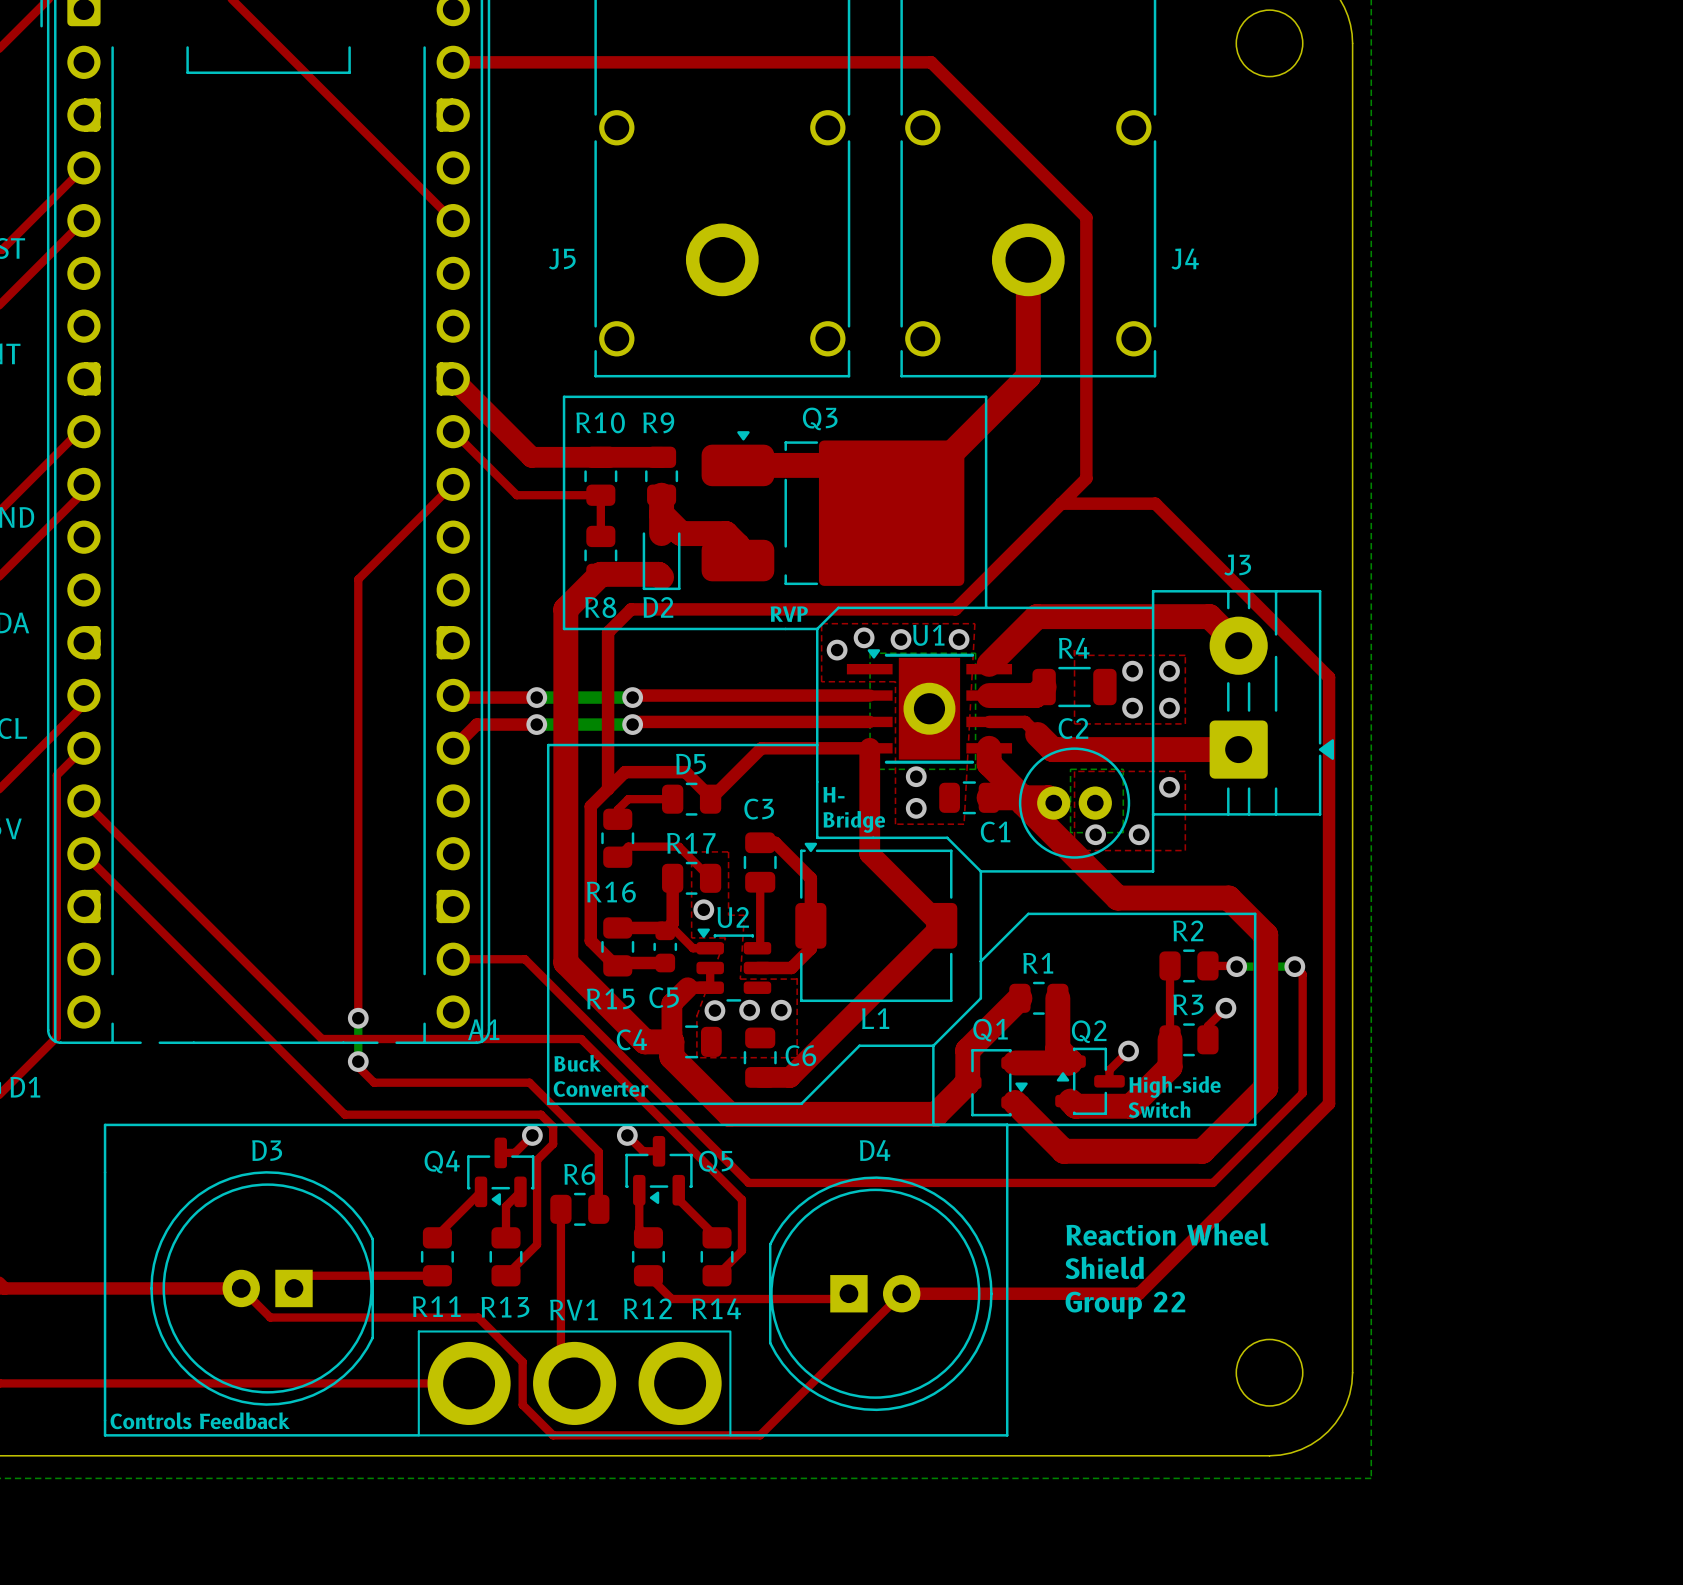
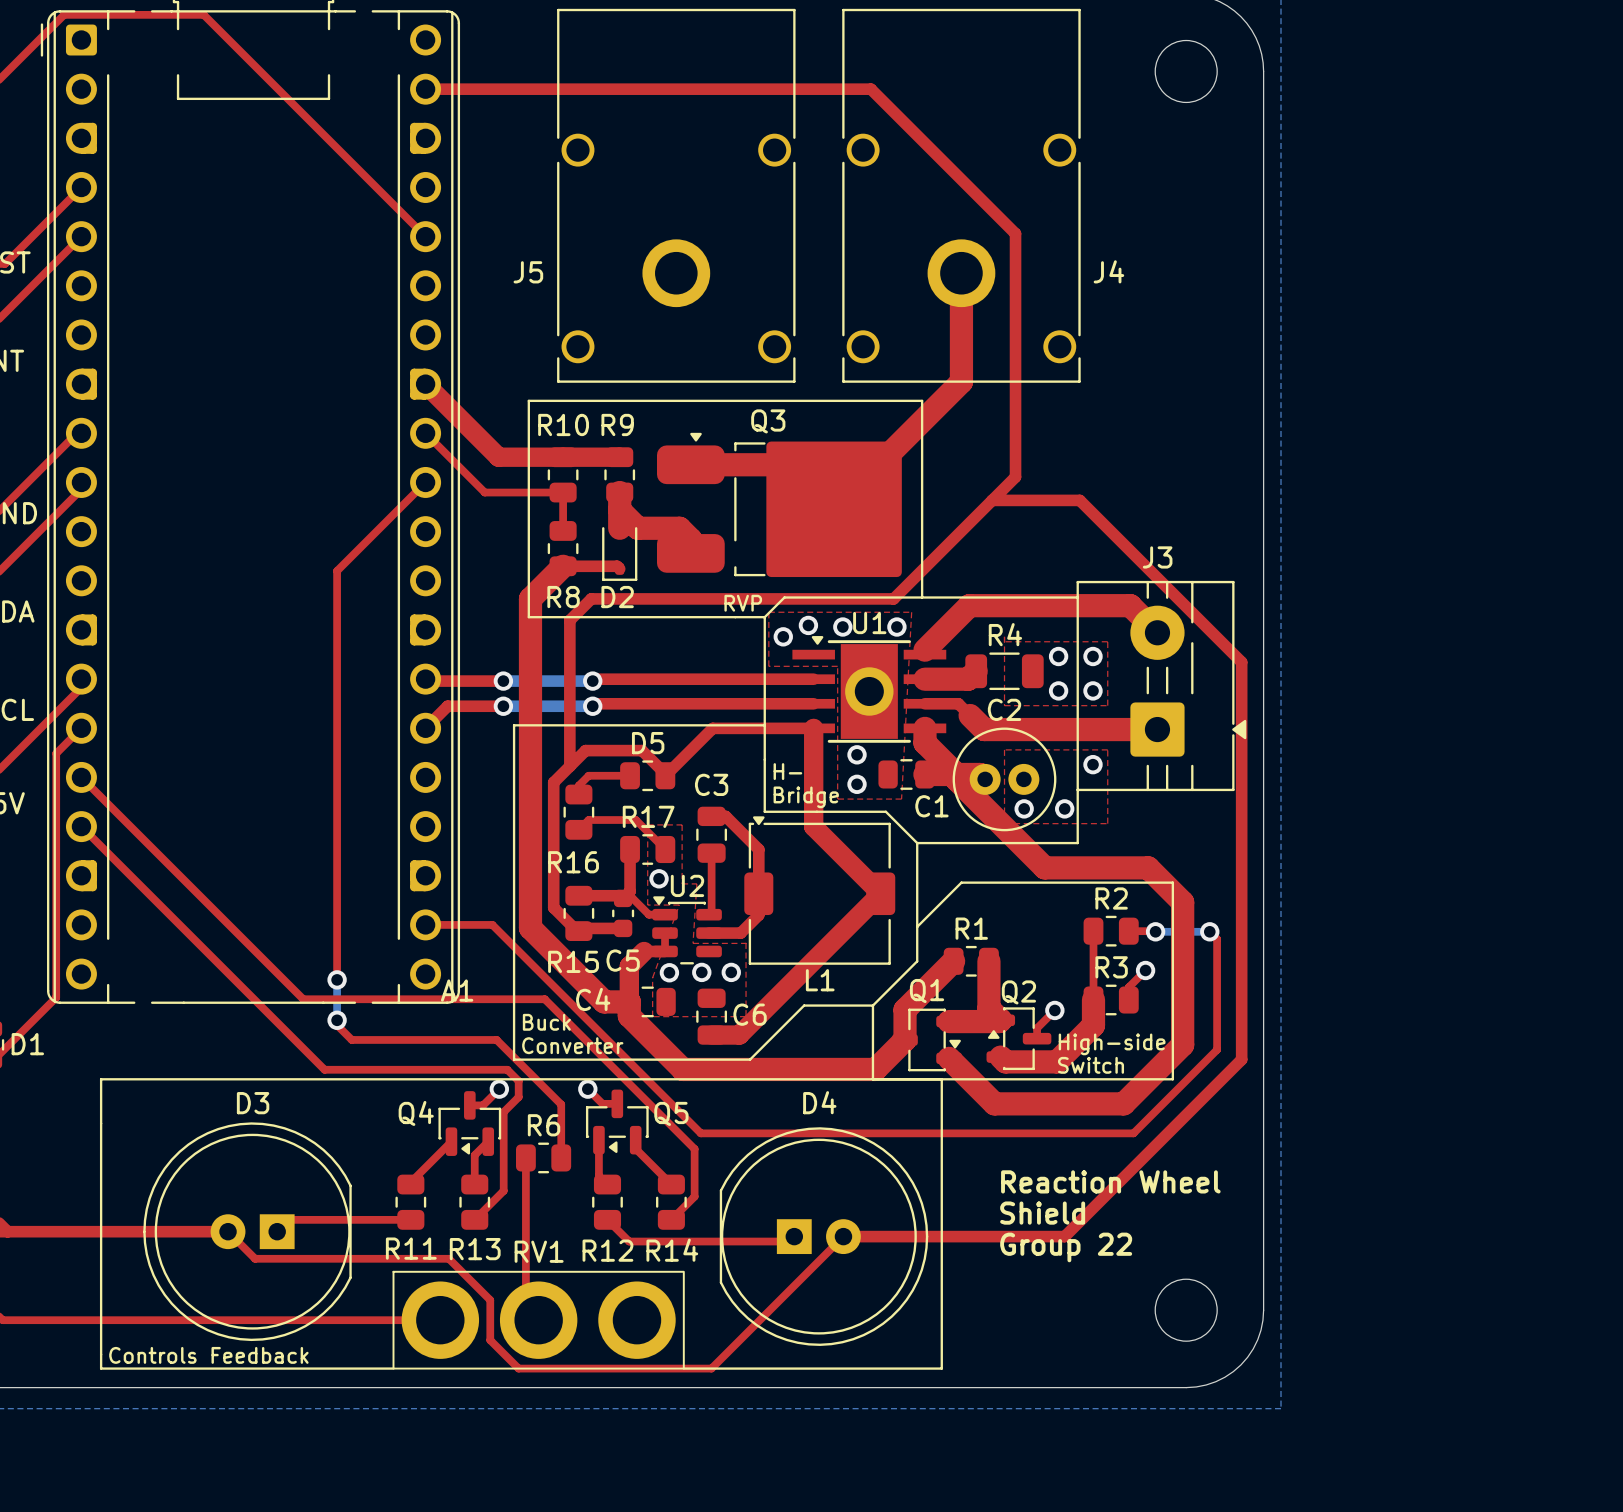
top track width: thick (600, 574) (658, 574) (661, 577) -> thin (563, 566) (617, 566) (619, 568)
bottom zone outline: (870, 653) (870, 769) (975, 769) (975, 653) (870, 653) -> none
bottom zone outline: (1070, 769) (1123, 769) (1123, 832) (1070, 832) (1070, 769) -> none

